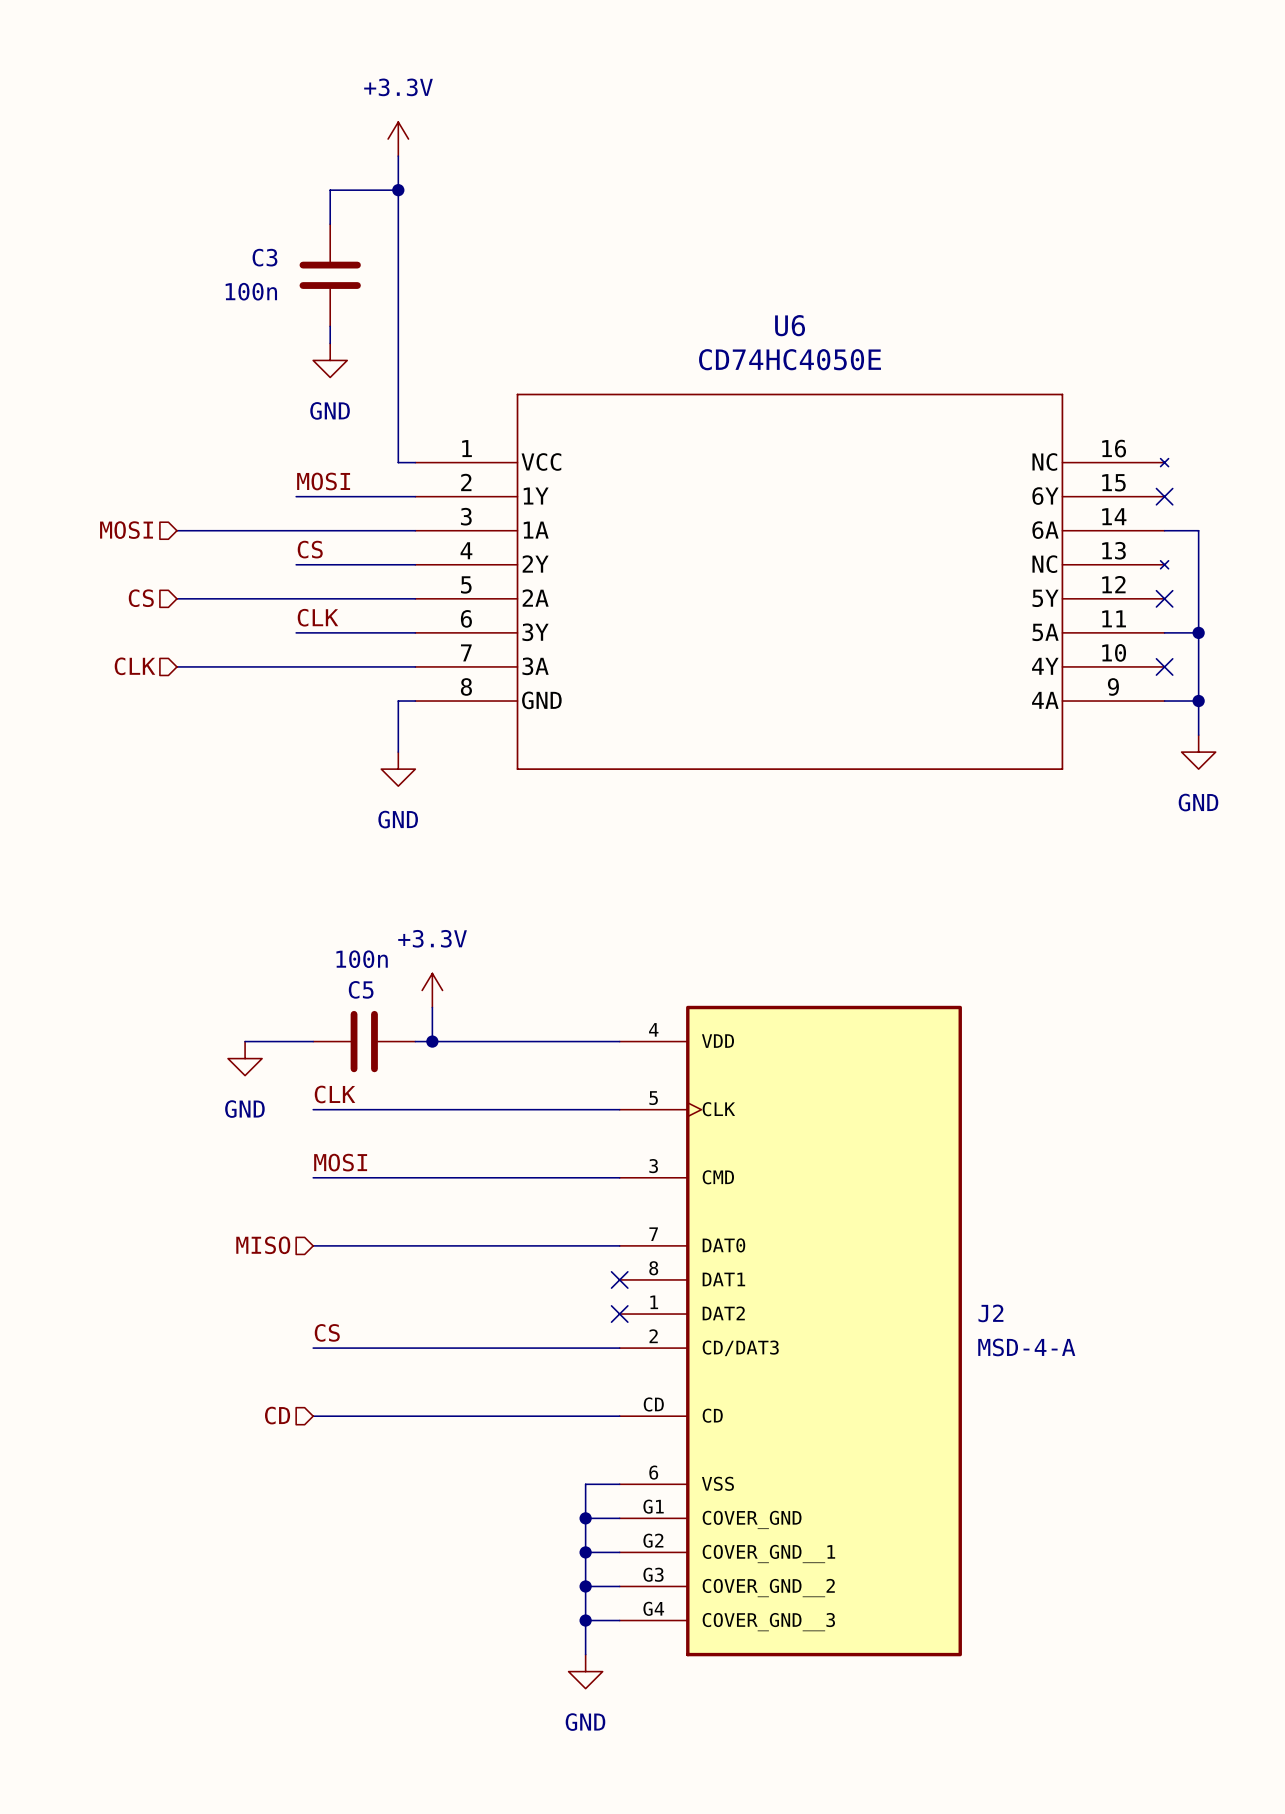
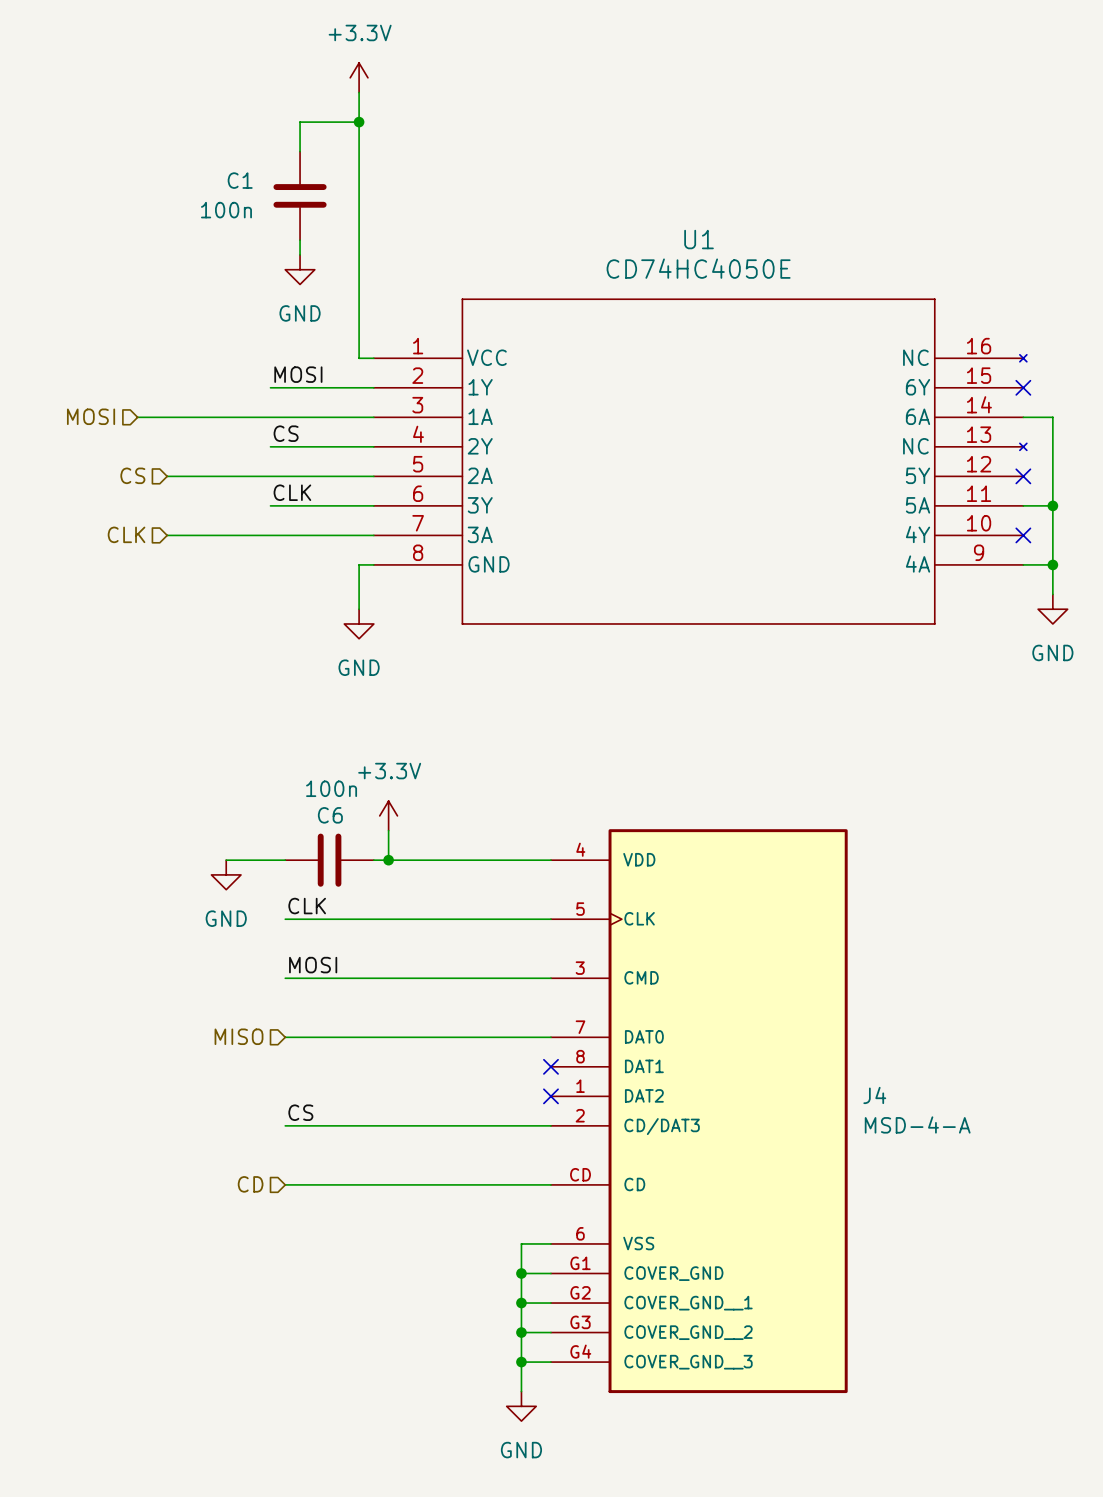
C3 name: C3 (264, 257) -> C1 (240, 180)
U6 name: U6 (790, 325) -> U1 (699, 239)
hierarchical label position: MOSI (126, 530) -> MOSI (91, 416)
wire: none -> (137, 417) (167, 417)
C5 name: C5 (361, 989) -> C6 (330, 815)
J2 name: J2 (990, 1313) -> J4 (874, 1095)

